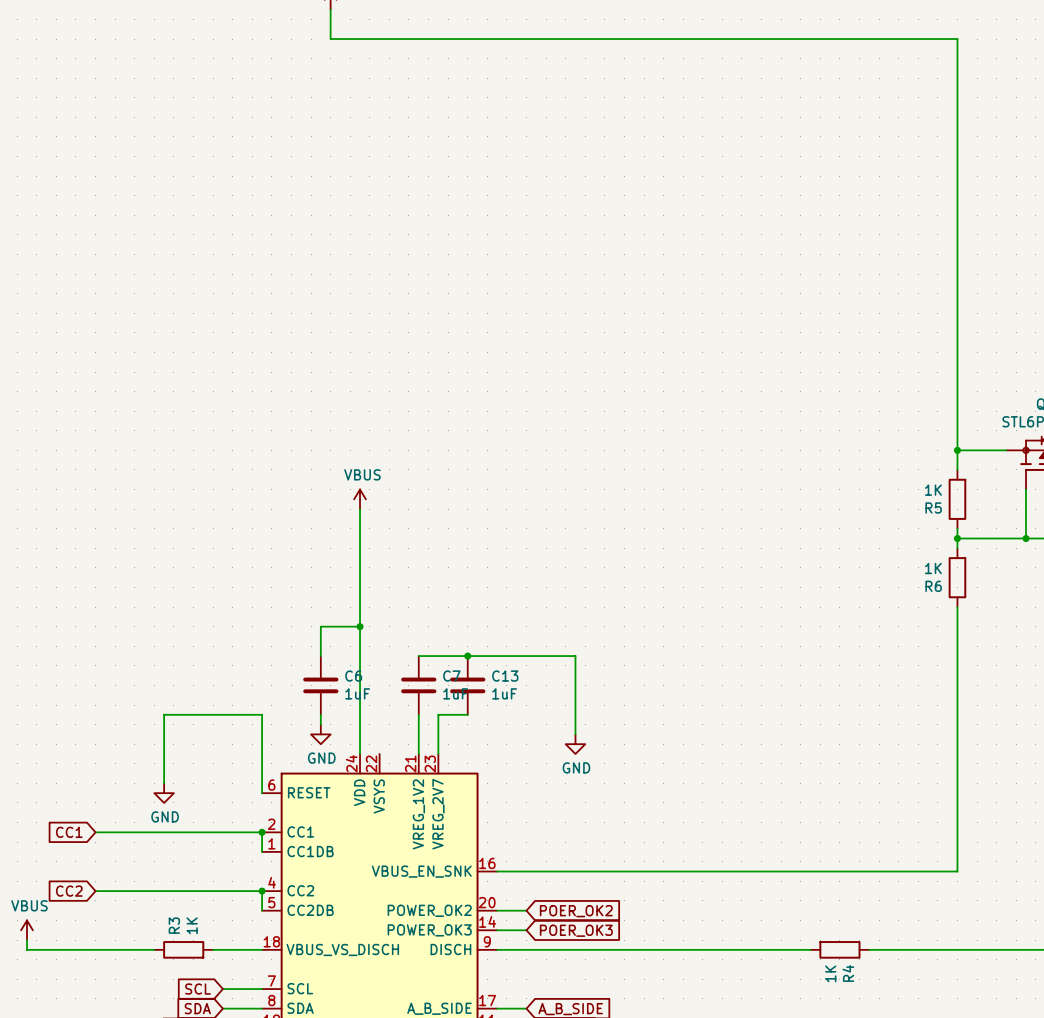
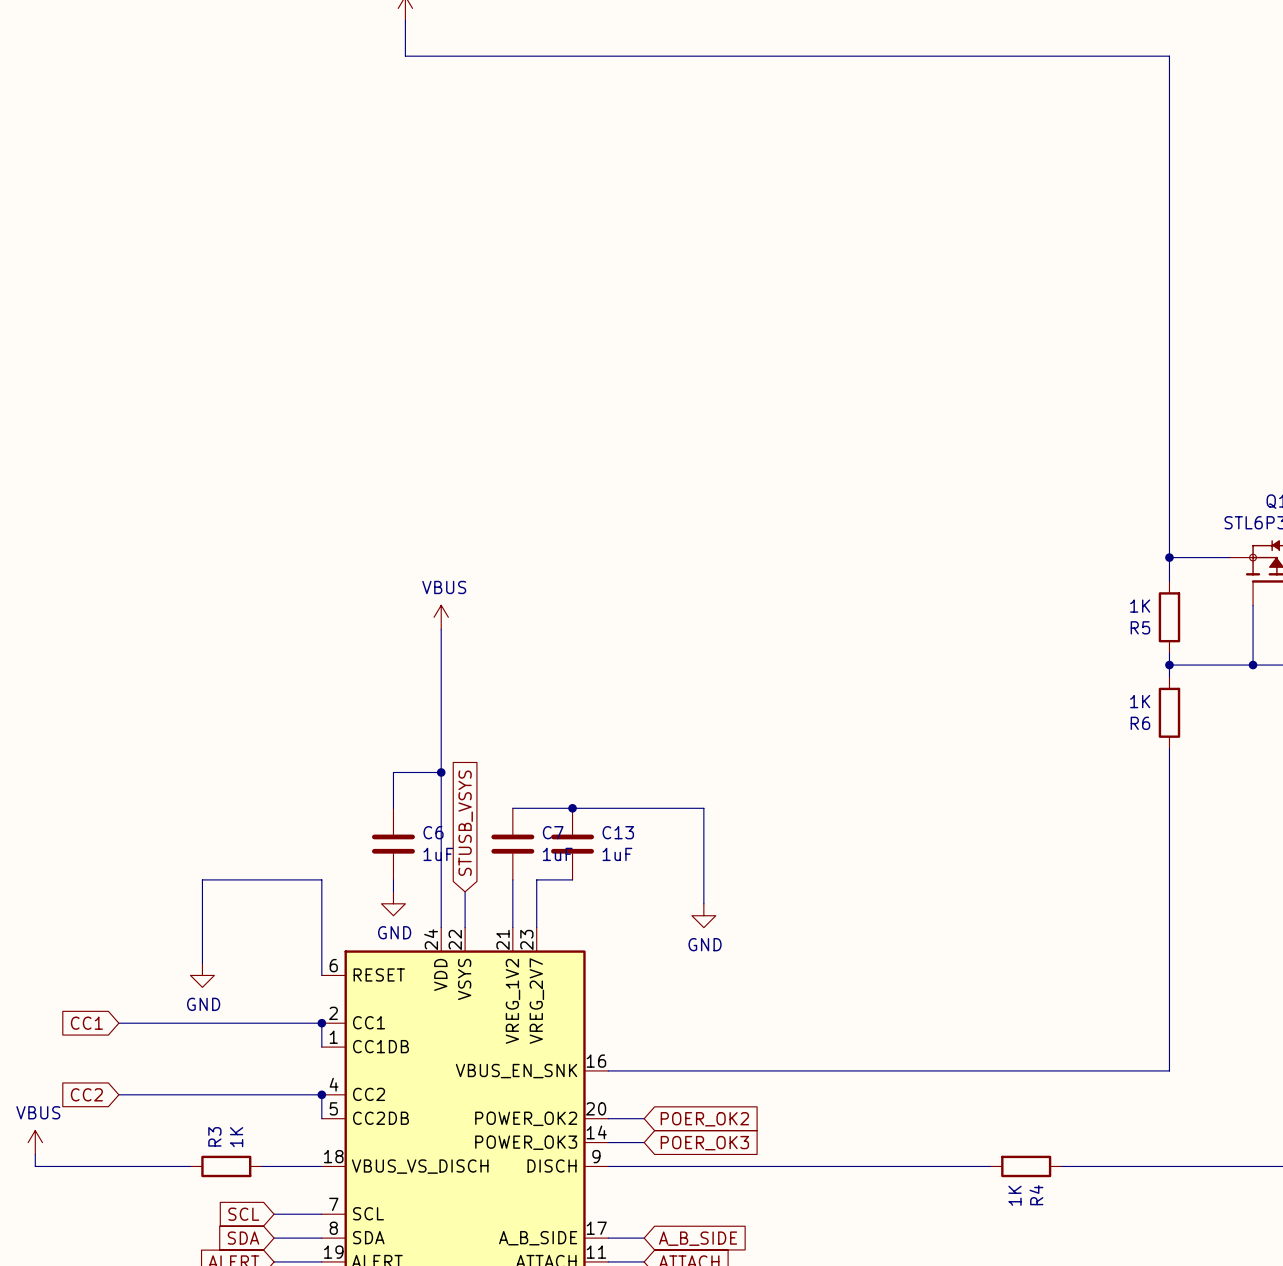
global label: none -> STUSB_VSYS (465, 823)
wire: none -> (465, 891) (465, 927)

